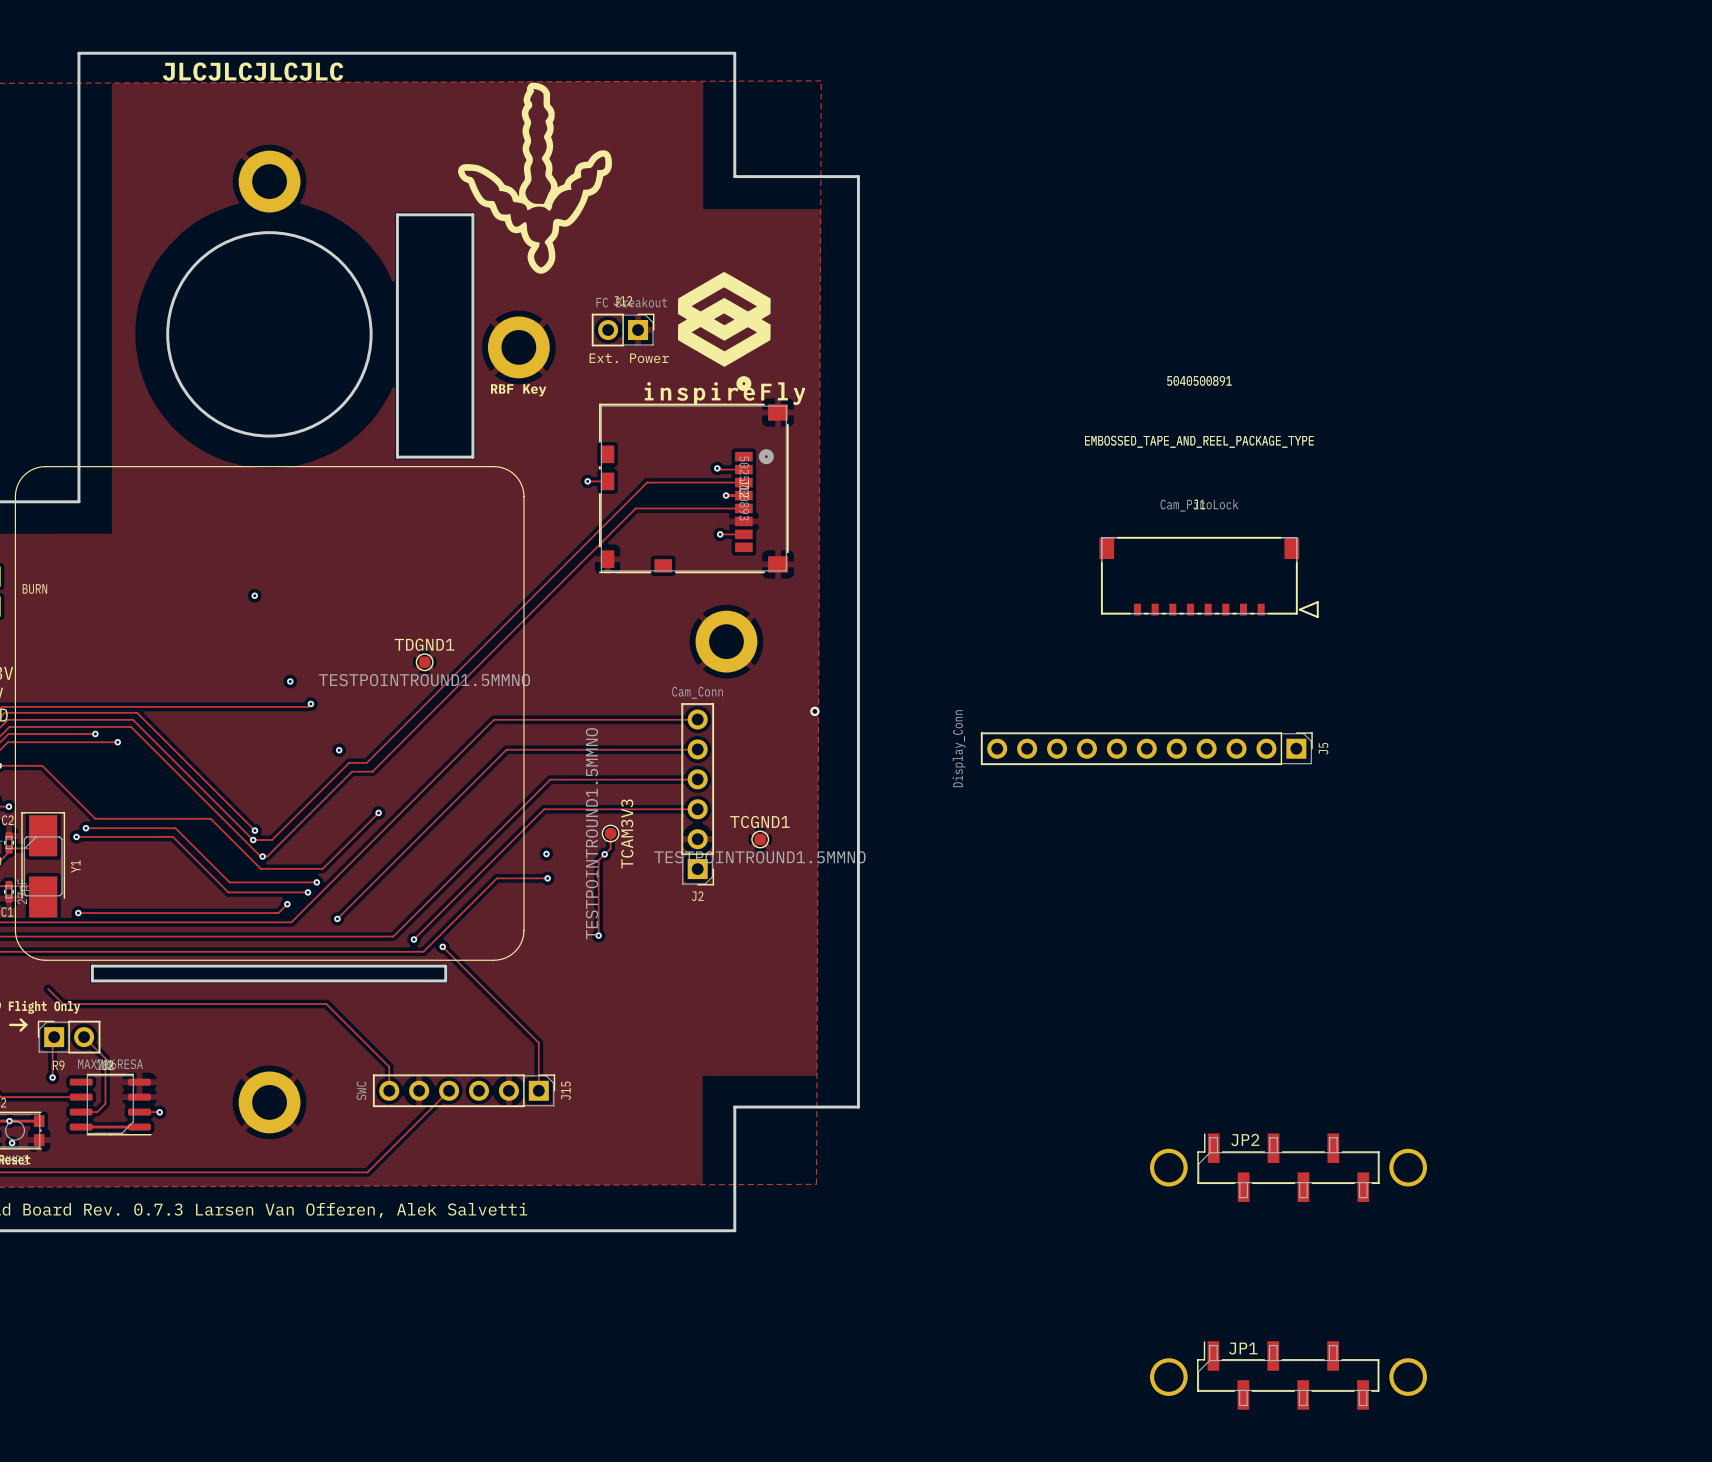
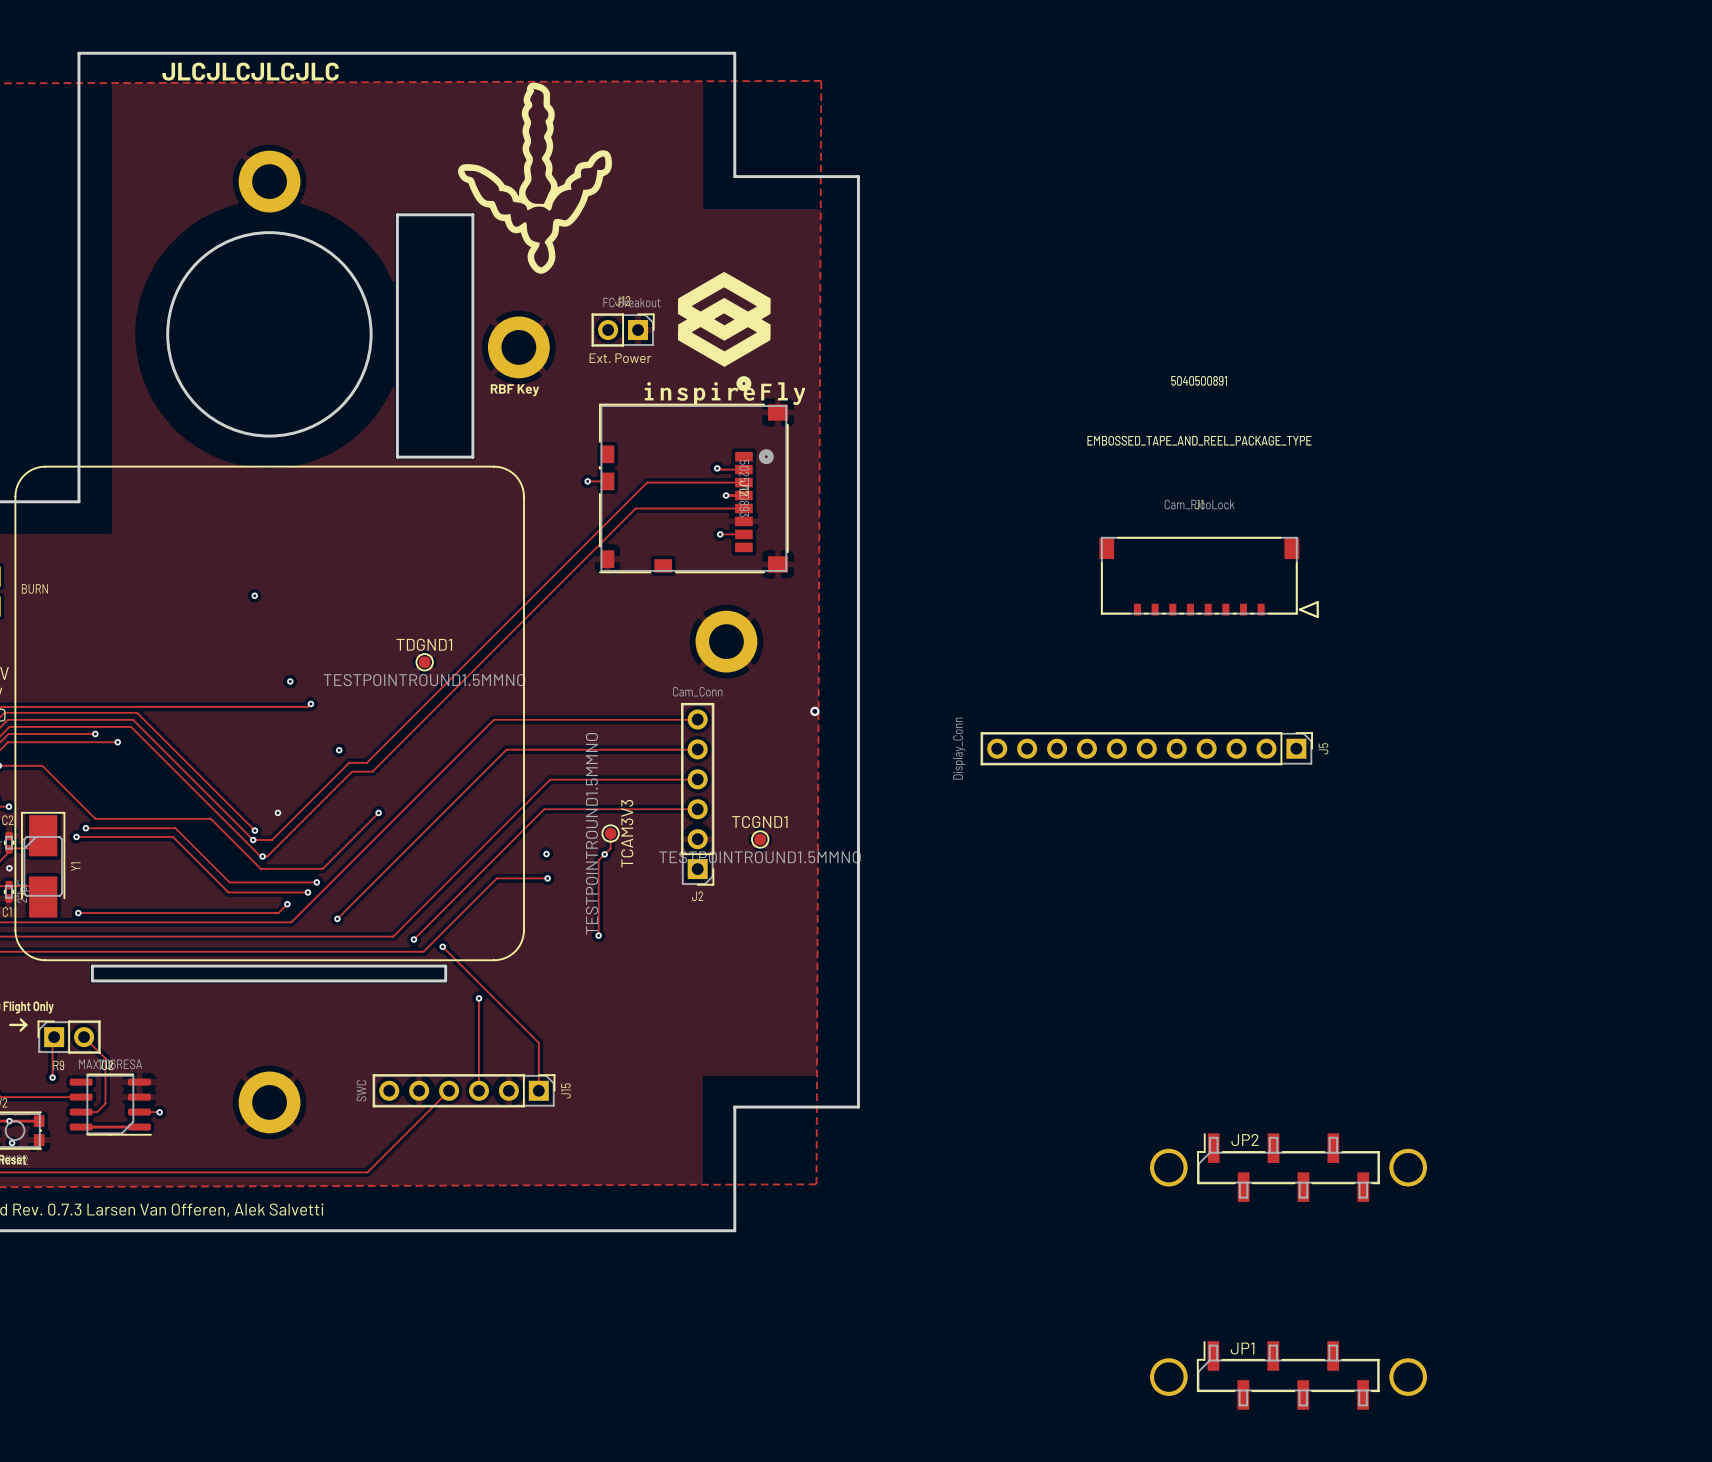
via: none -> (277, 812)
via: none -> (9, 868)
track: (48, 989) (63, 1004) (326, 1004) (389, 1066) (389, 1090) -> none
track: none -> (479, 998) (479, 1090)
via: none -> (479, 998)

